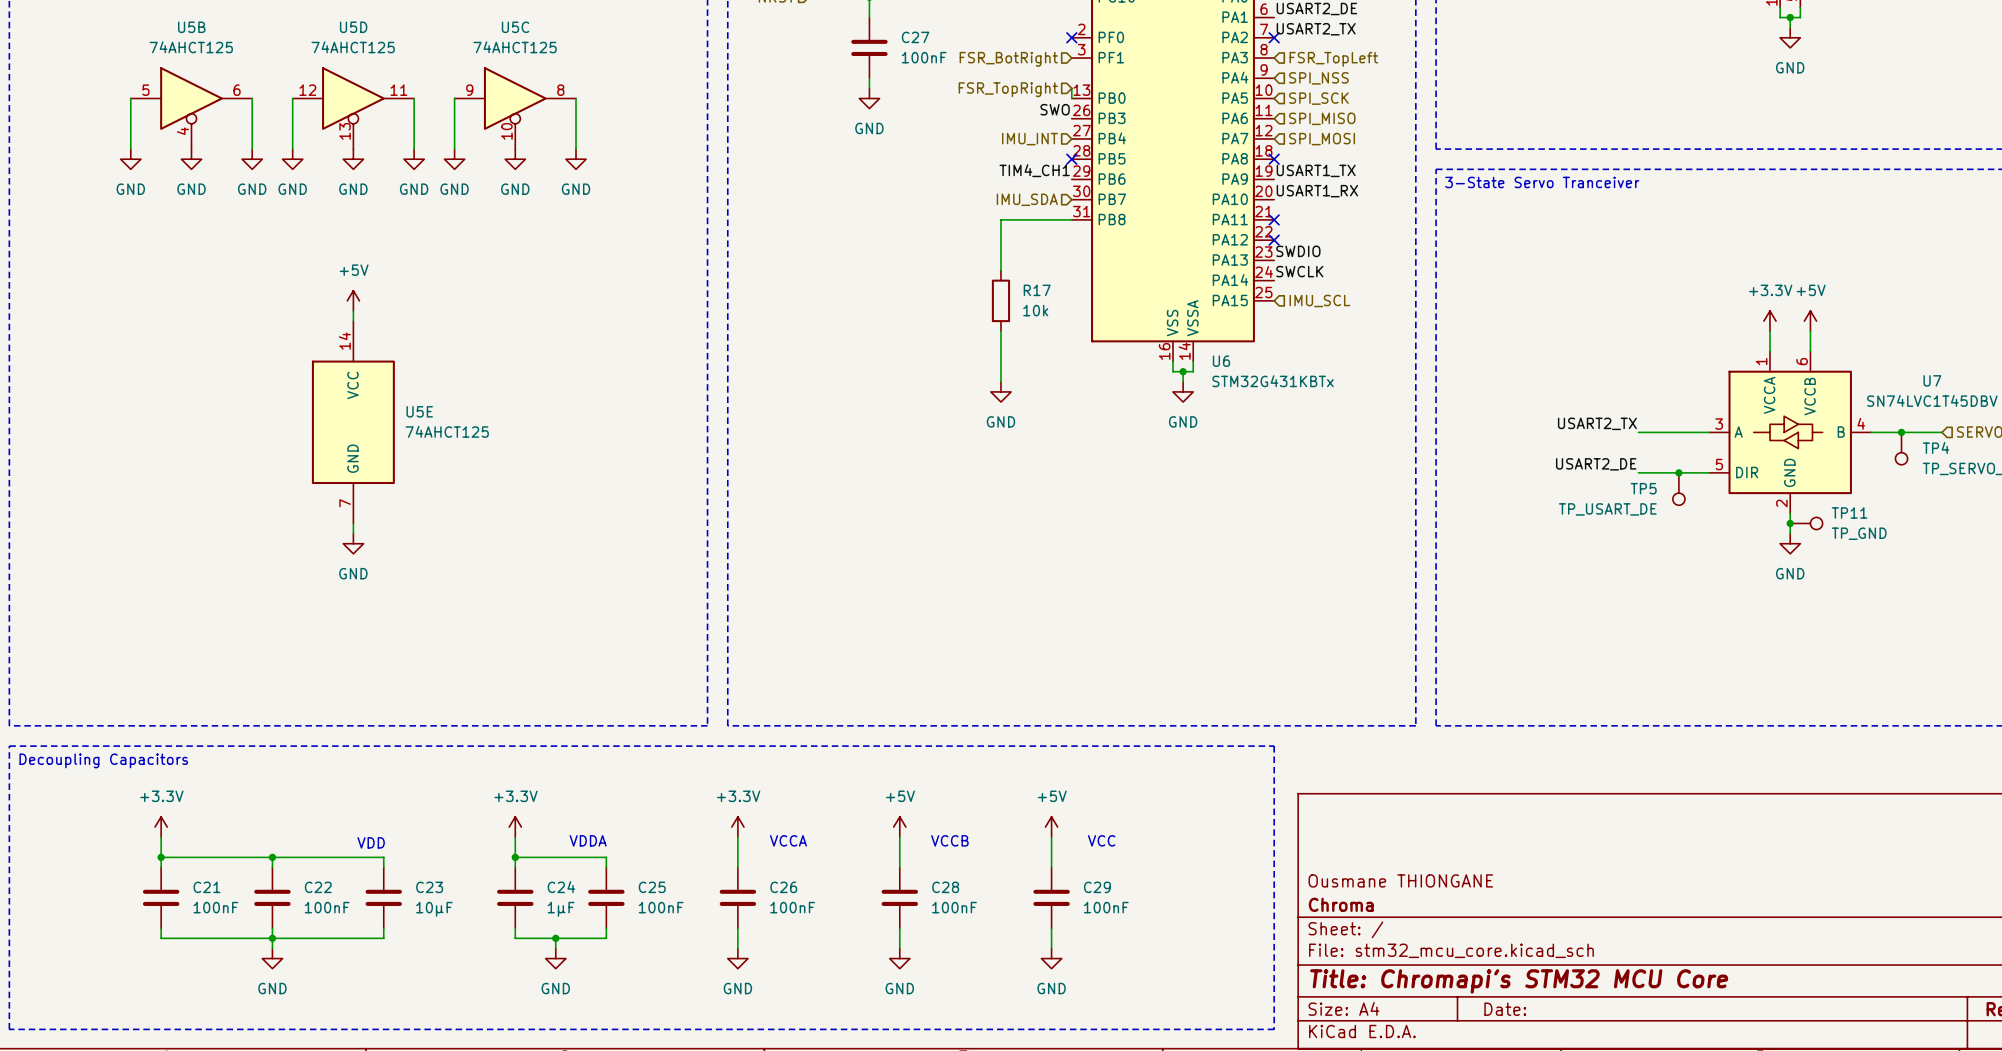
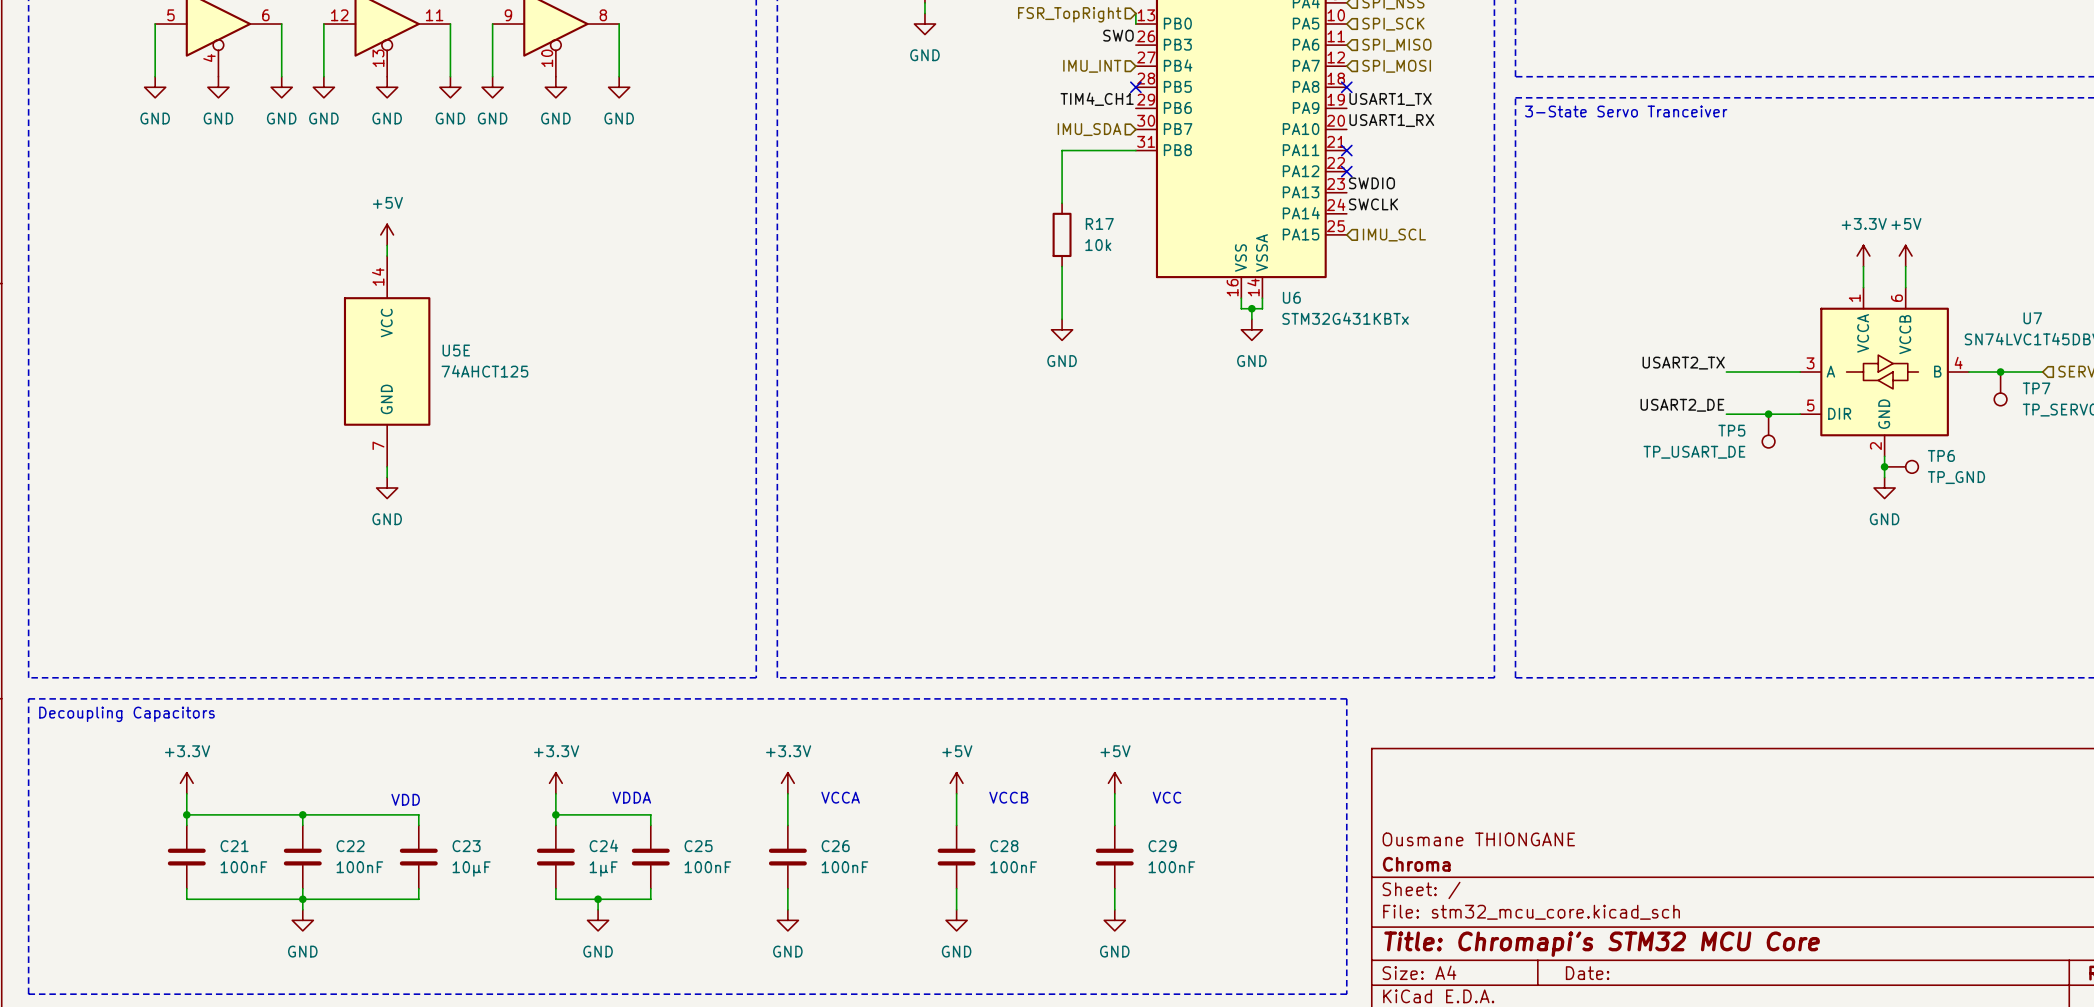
TP4 name: TP4 (1936, 447) -> TP7 (2036, 388)
TP11 name: TP11 (1849, 512) -> TP6 (1941, 455)

